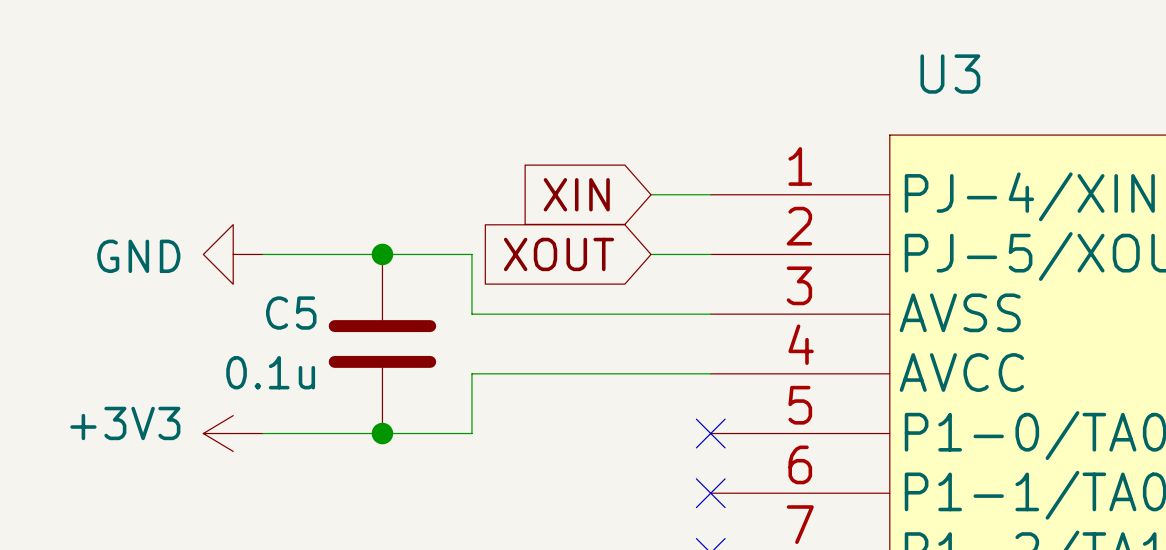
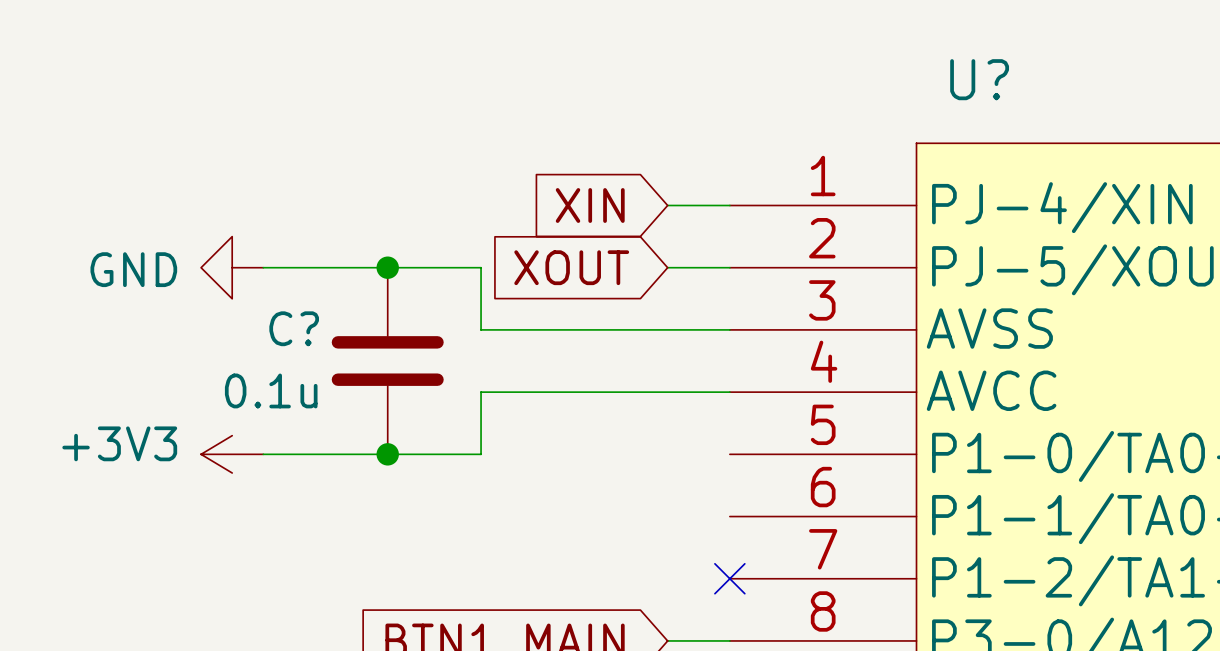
U3 name: U3 (950, 74) -> U? (979, 79)
C5 name: C5 (291, 313) -> C? (294, 328)
no-connect mark: (710, 433) -> none
no-connect mark: (710, 493) -> none

